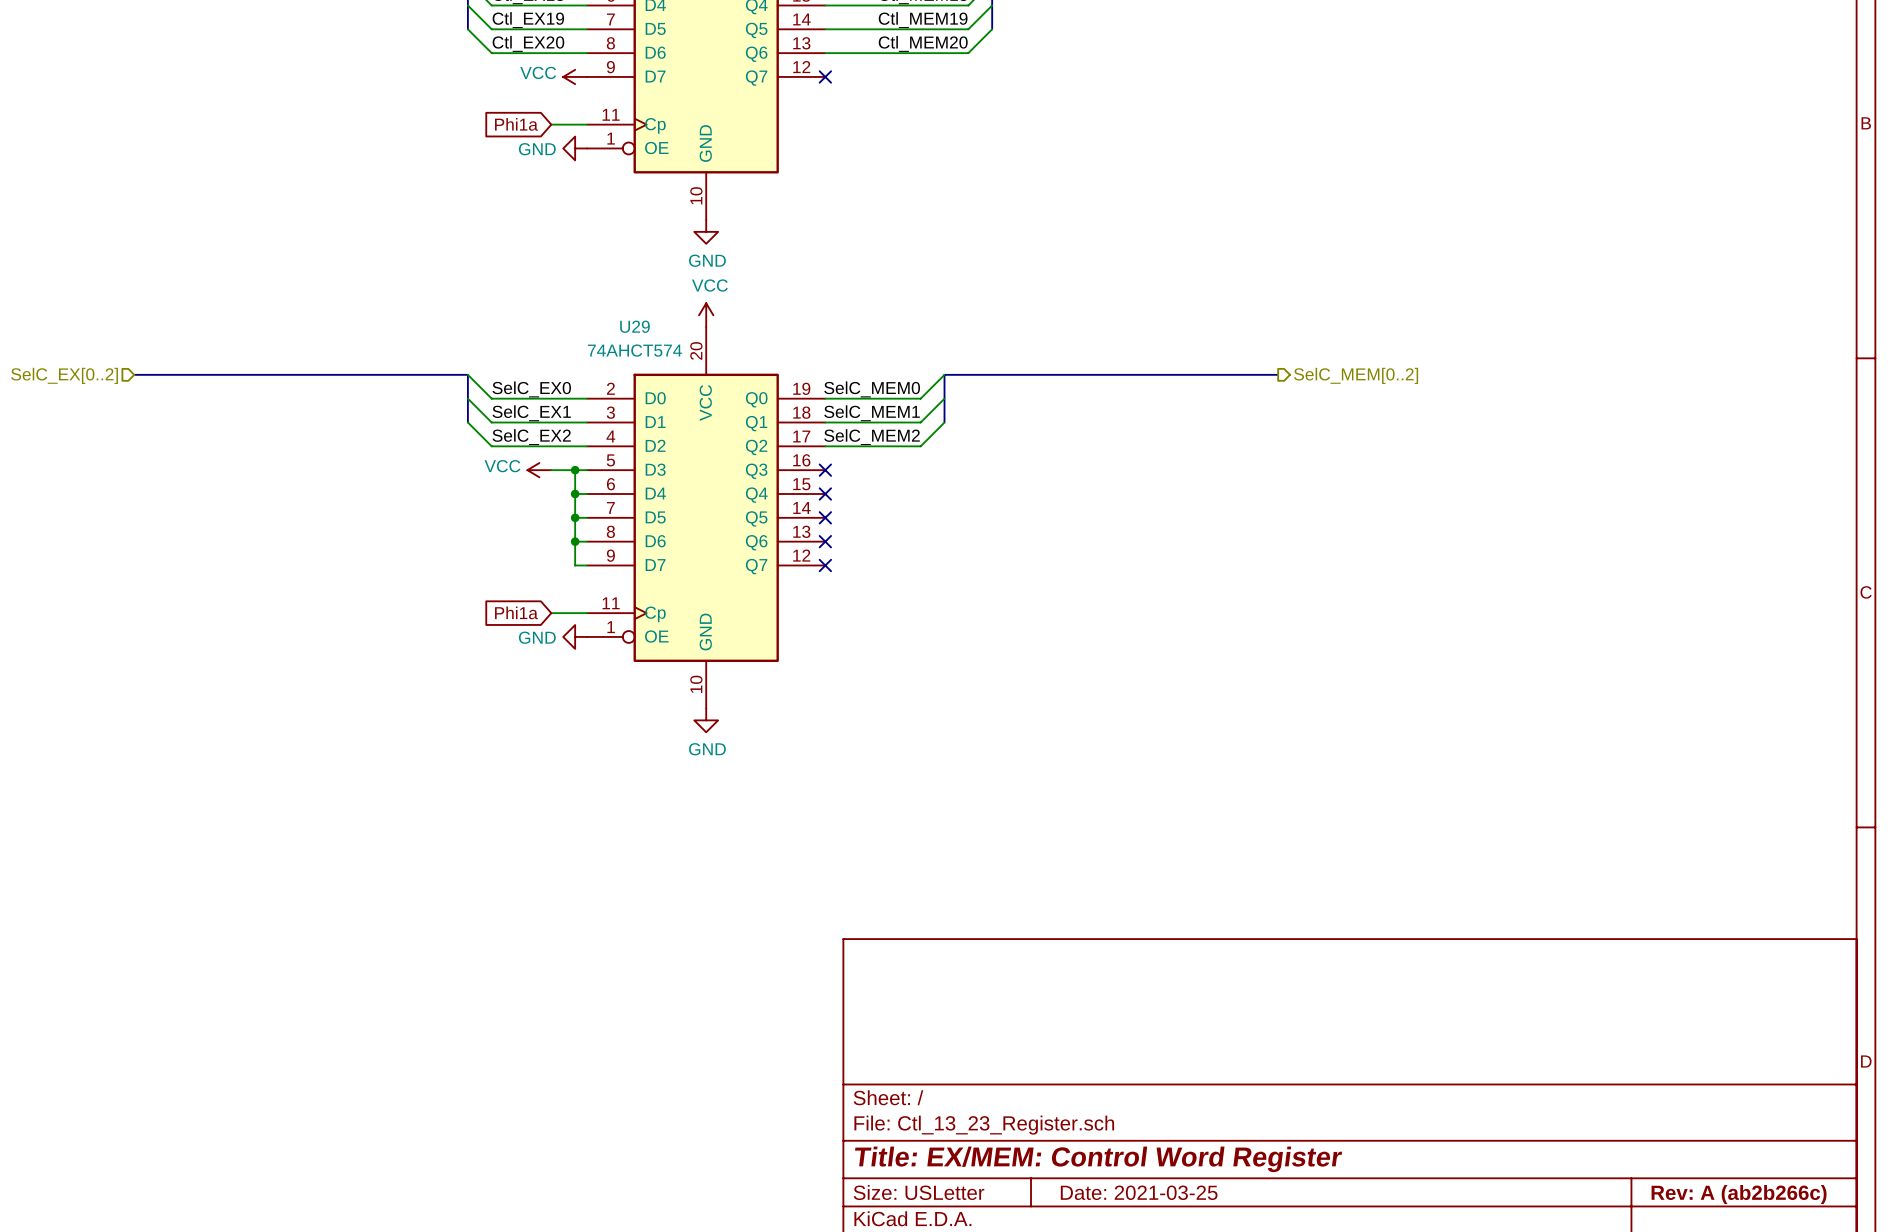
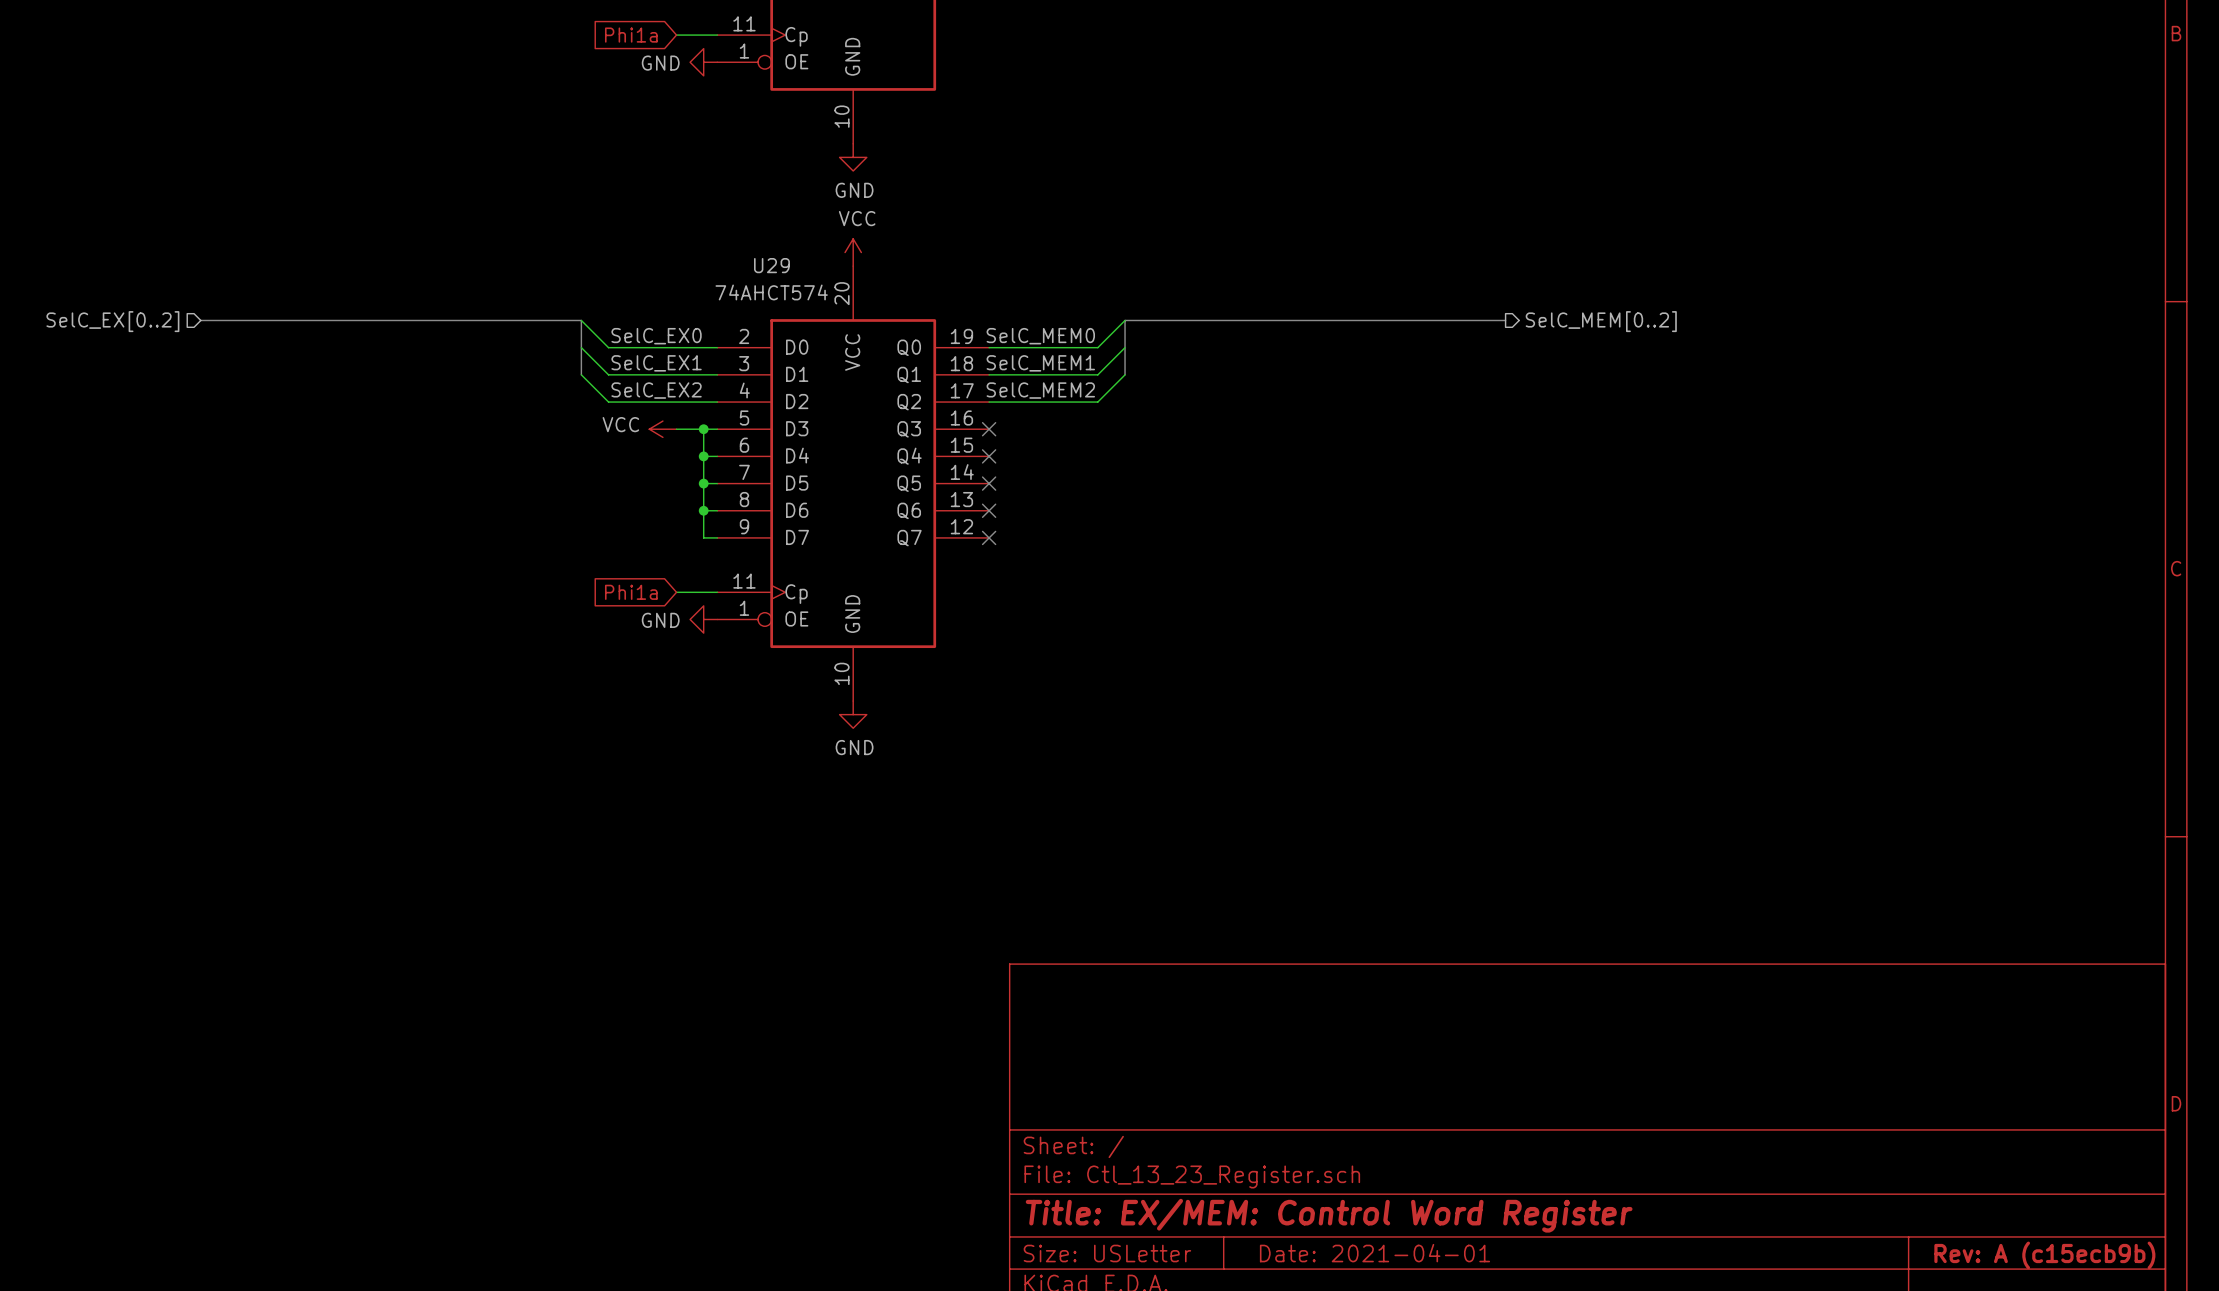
title block: Date: 2021-03-25 (1139, 1192) -> Date: 2021-04-01 (1374, 1253)
title block: Rev: A (ab2b266c) (1739, 1194) -> Rev: A (c15ecb9b) (2044, 1255)

